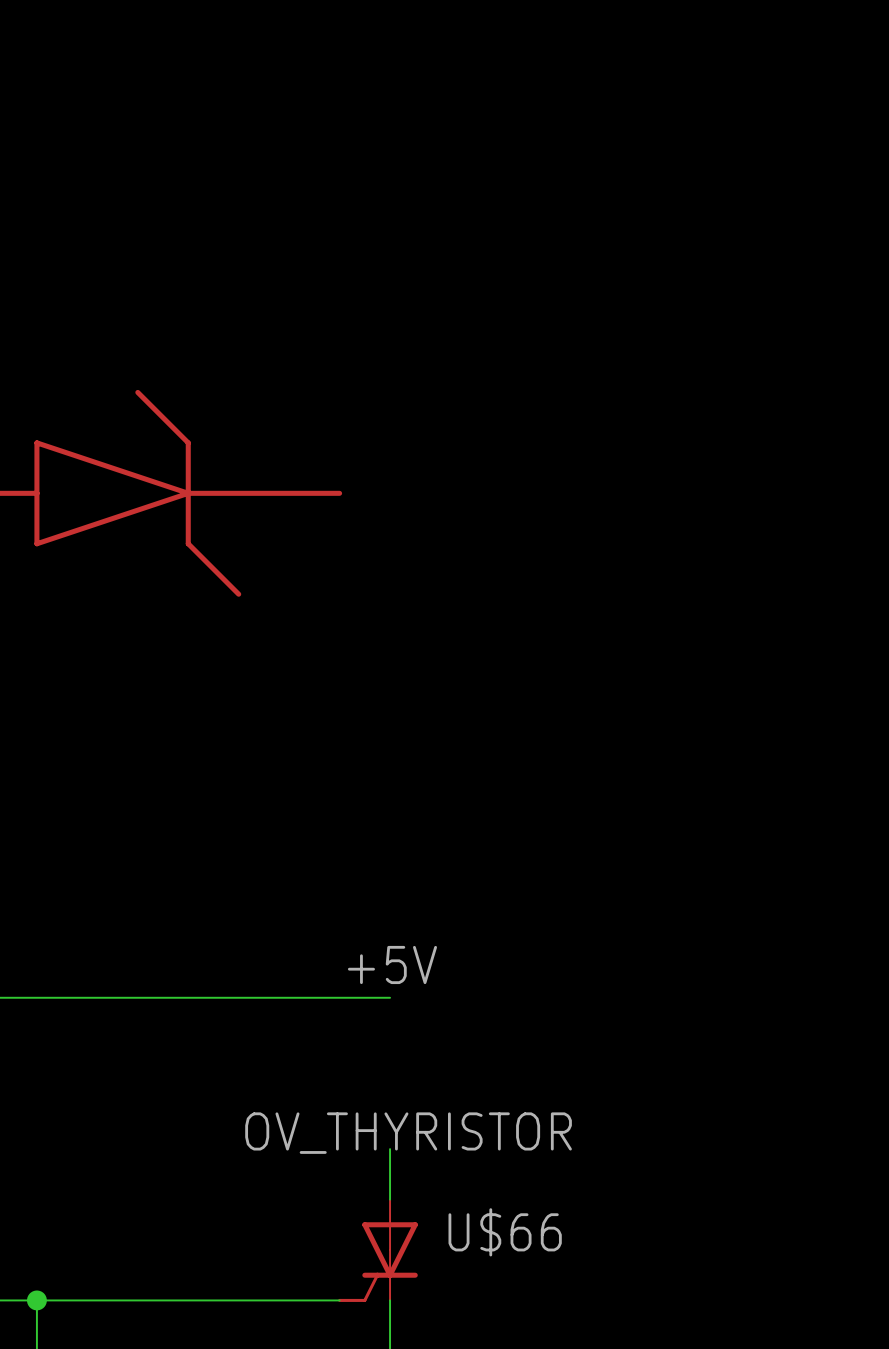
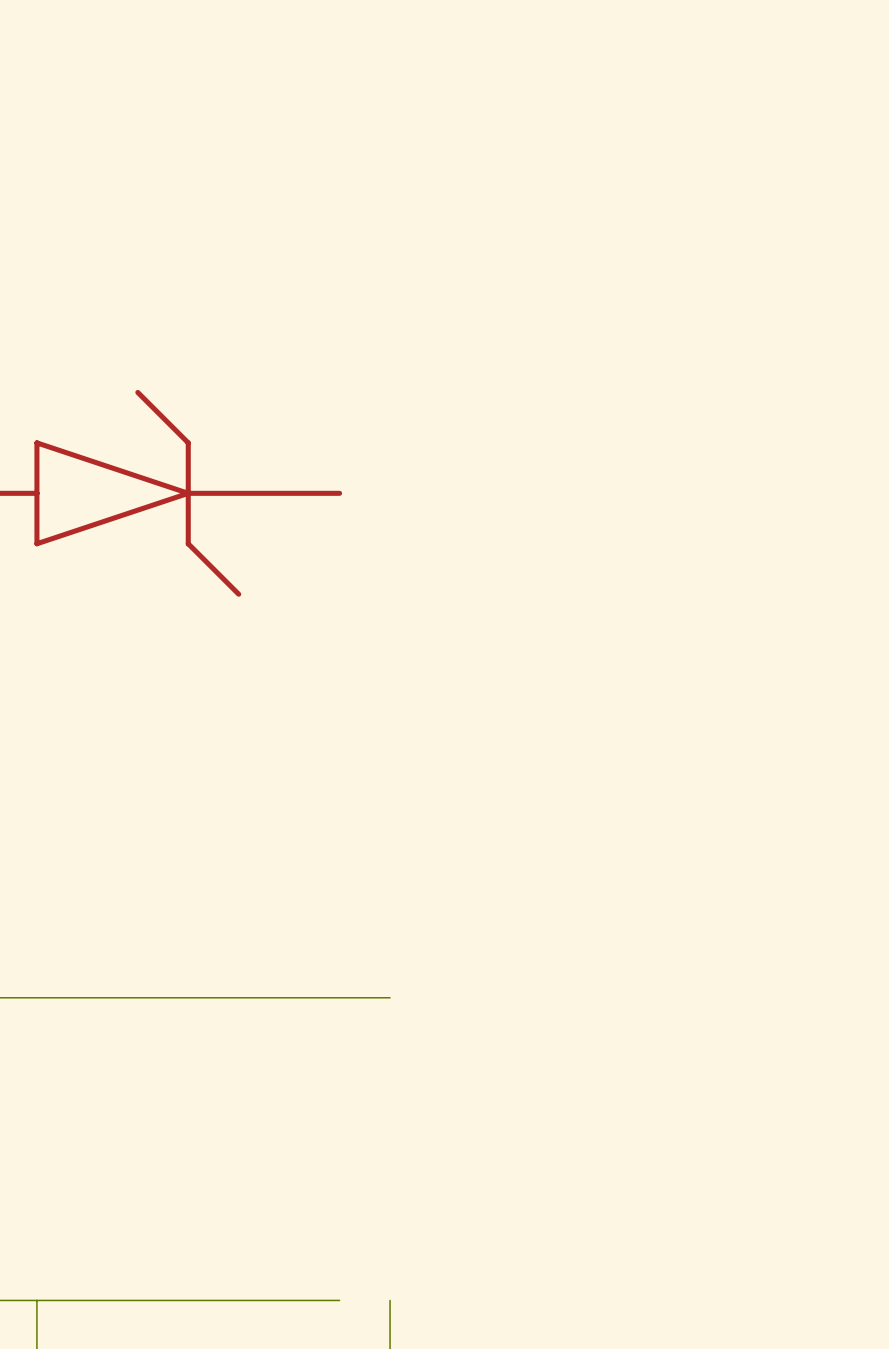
label: +5V (392, 964) -> none
label: OV_THYRISTOR (408, 1133) -> none
wire: (390, 1149) (390, 1199) -> none
U$66: (377, 1250) -> none
junction: (36, 1300) -> none

